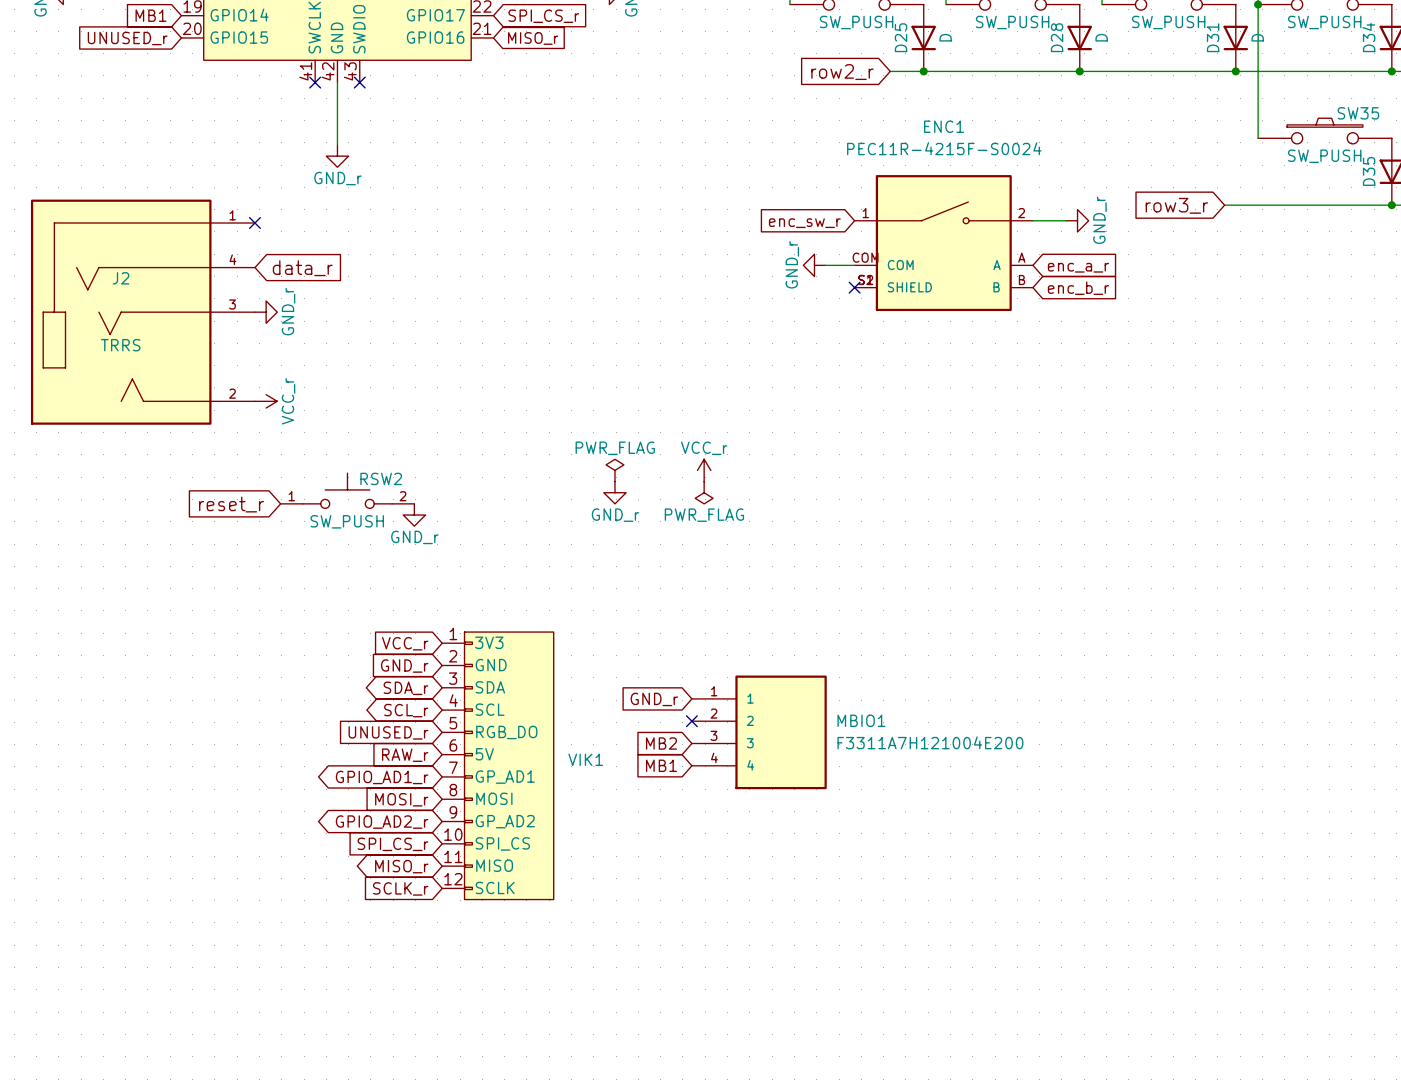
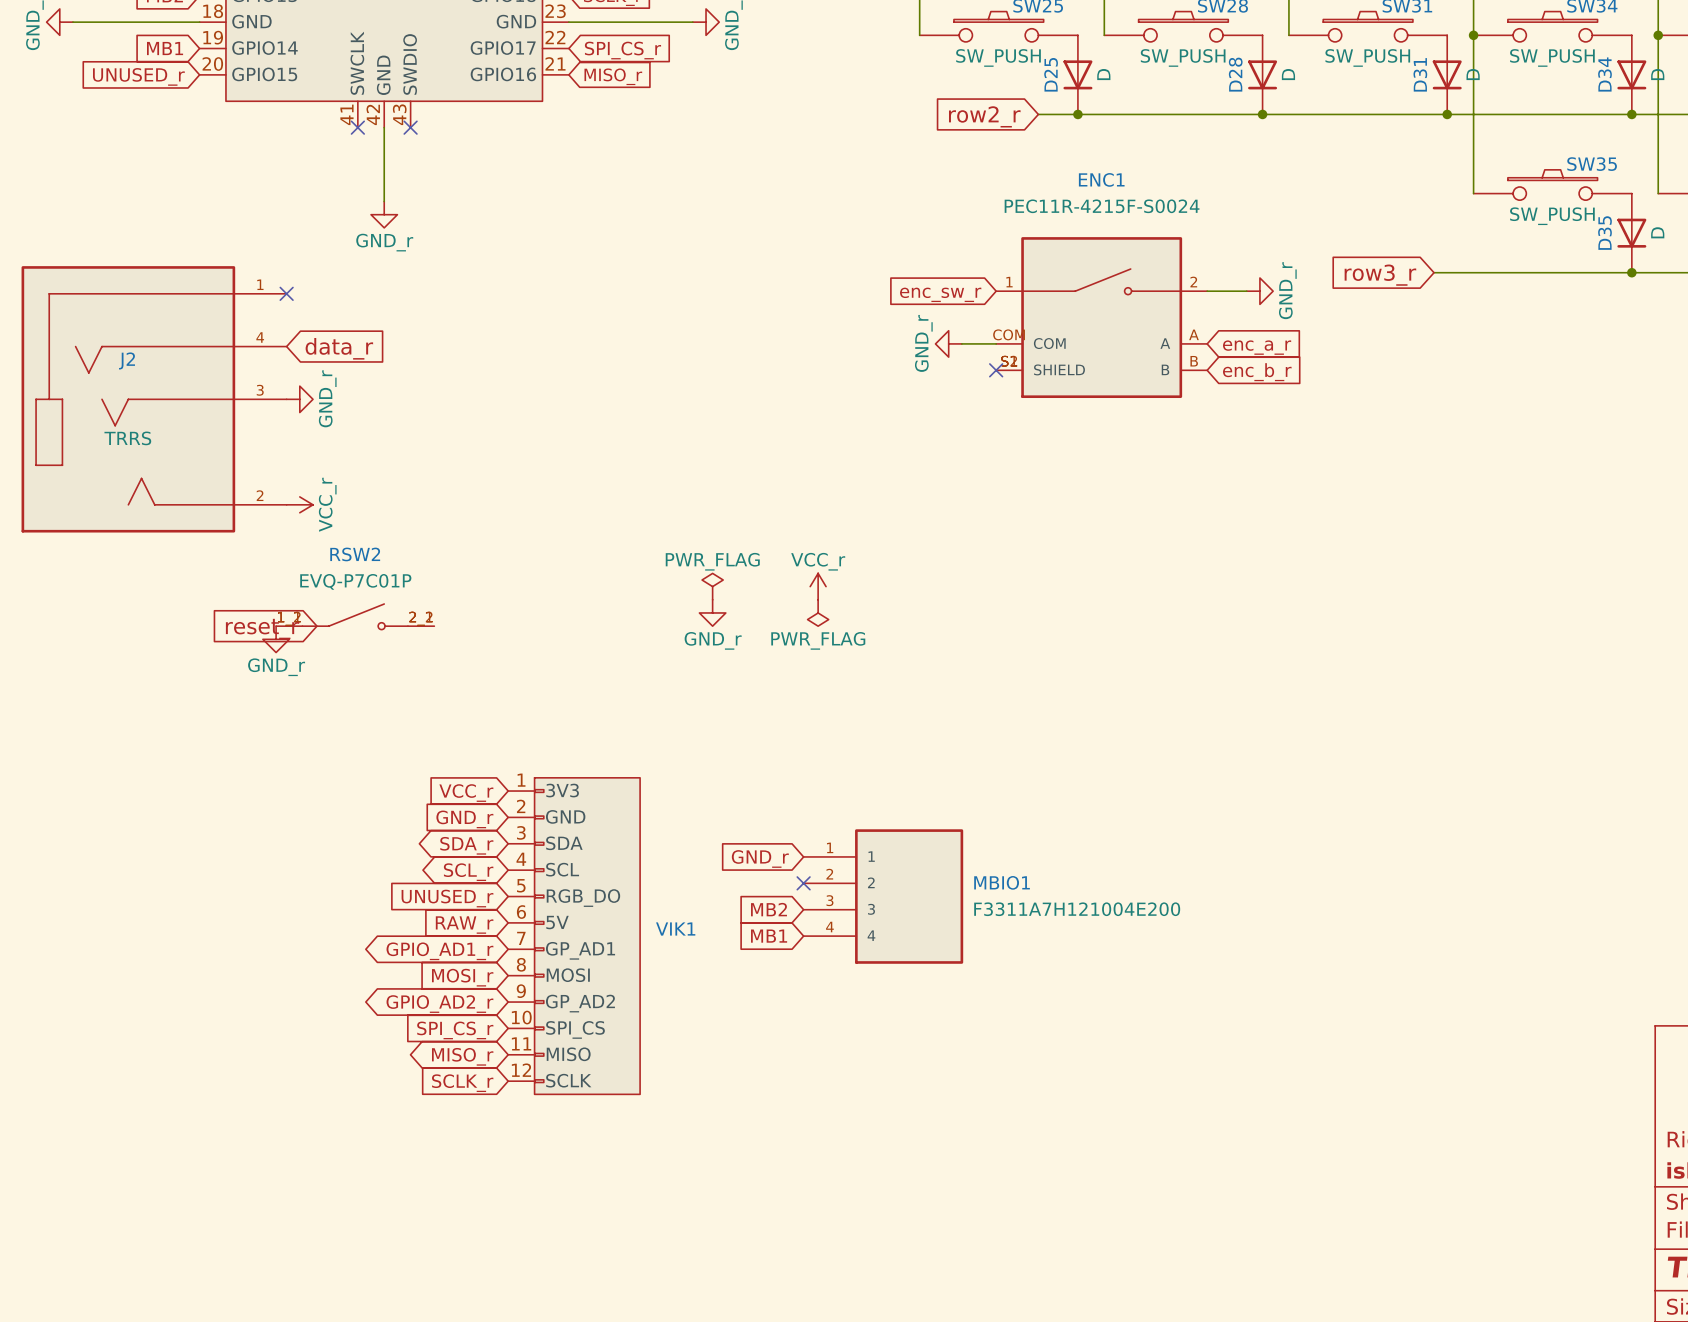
RSW2 symbol: [280, 472, 415, 510] -> [276, 603, 435, 631]
RSW2 name position: RSW2 (381, 478) -> RSW2 (355, 554)
power symbol position: GND_r (414, 515) -> GND_r (276, 639)
RSW2 value: SW_PUSH (347, 521) -> EVQ-P7C01P (355, 581)

